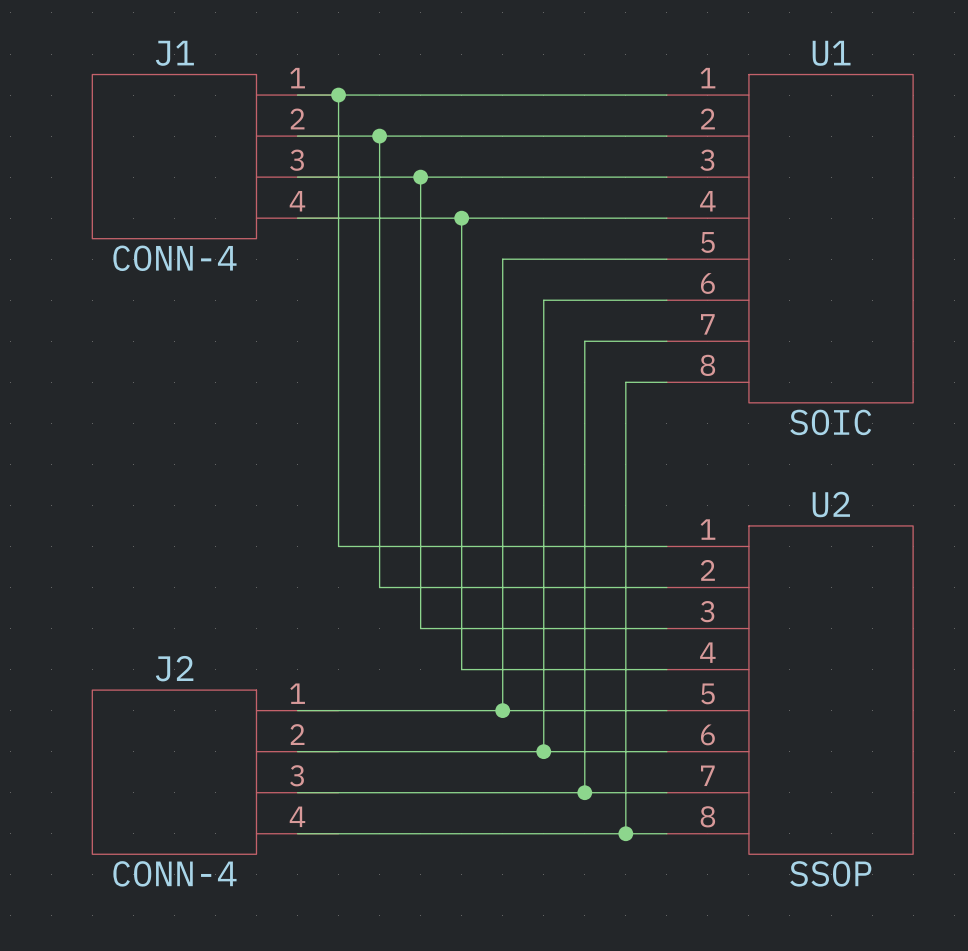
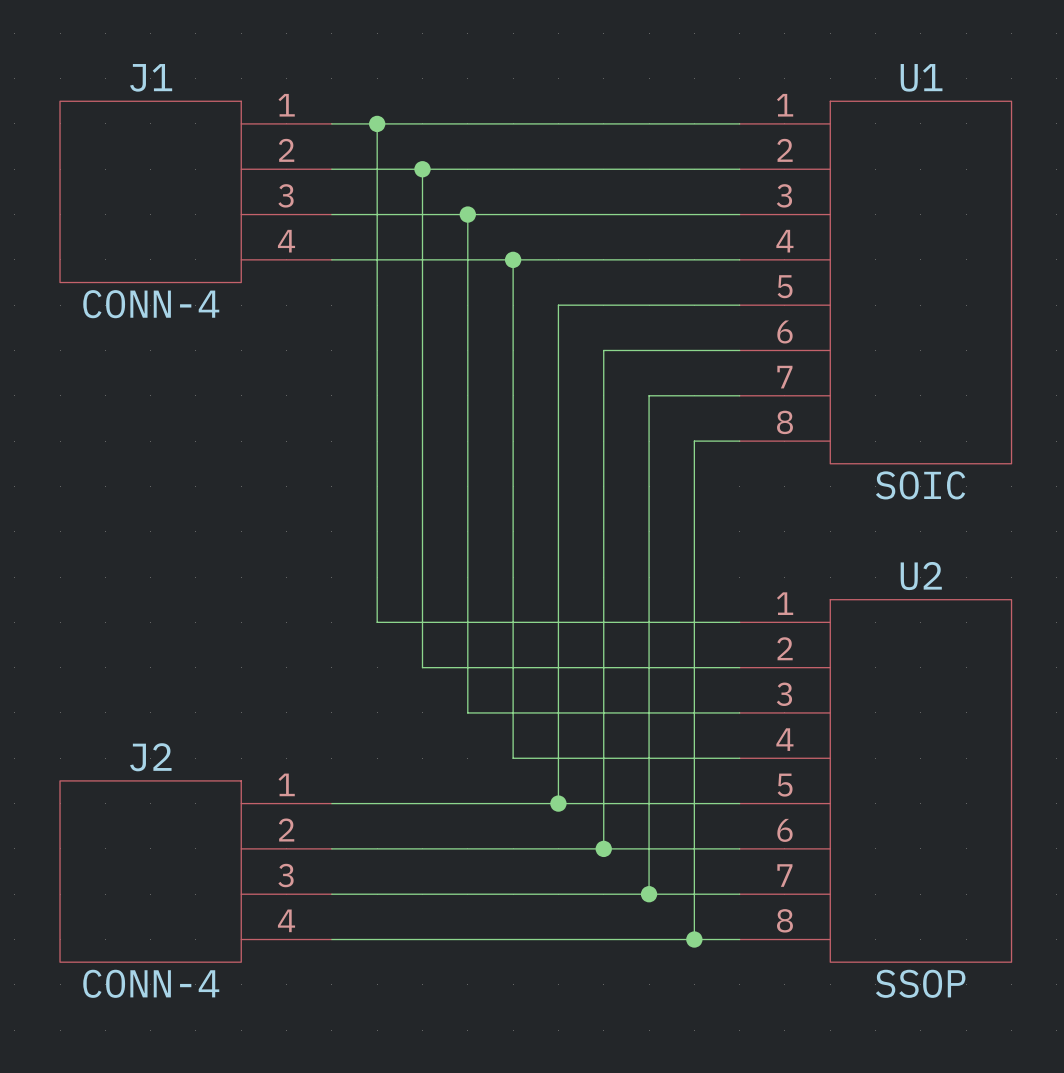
J1 position: (215, 156) -> (195, 191)
J2 position: (215, 772) -> (195, 871)

